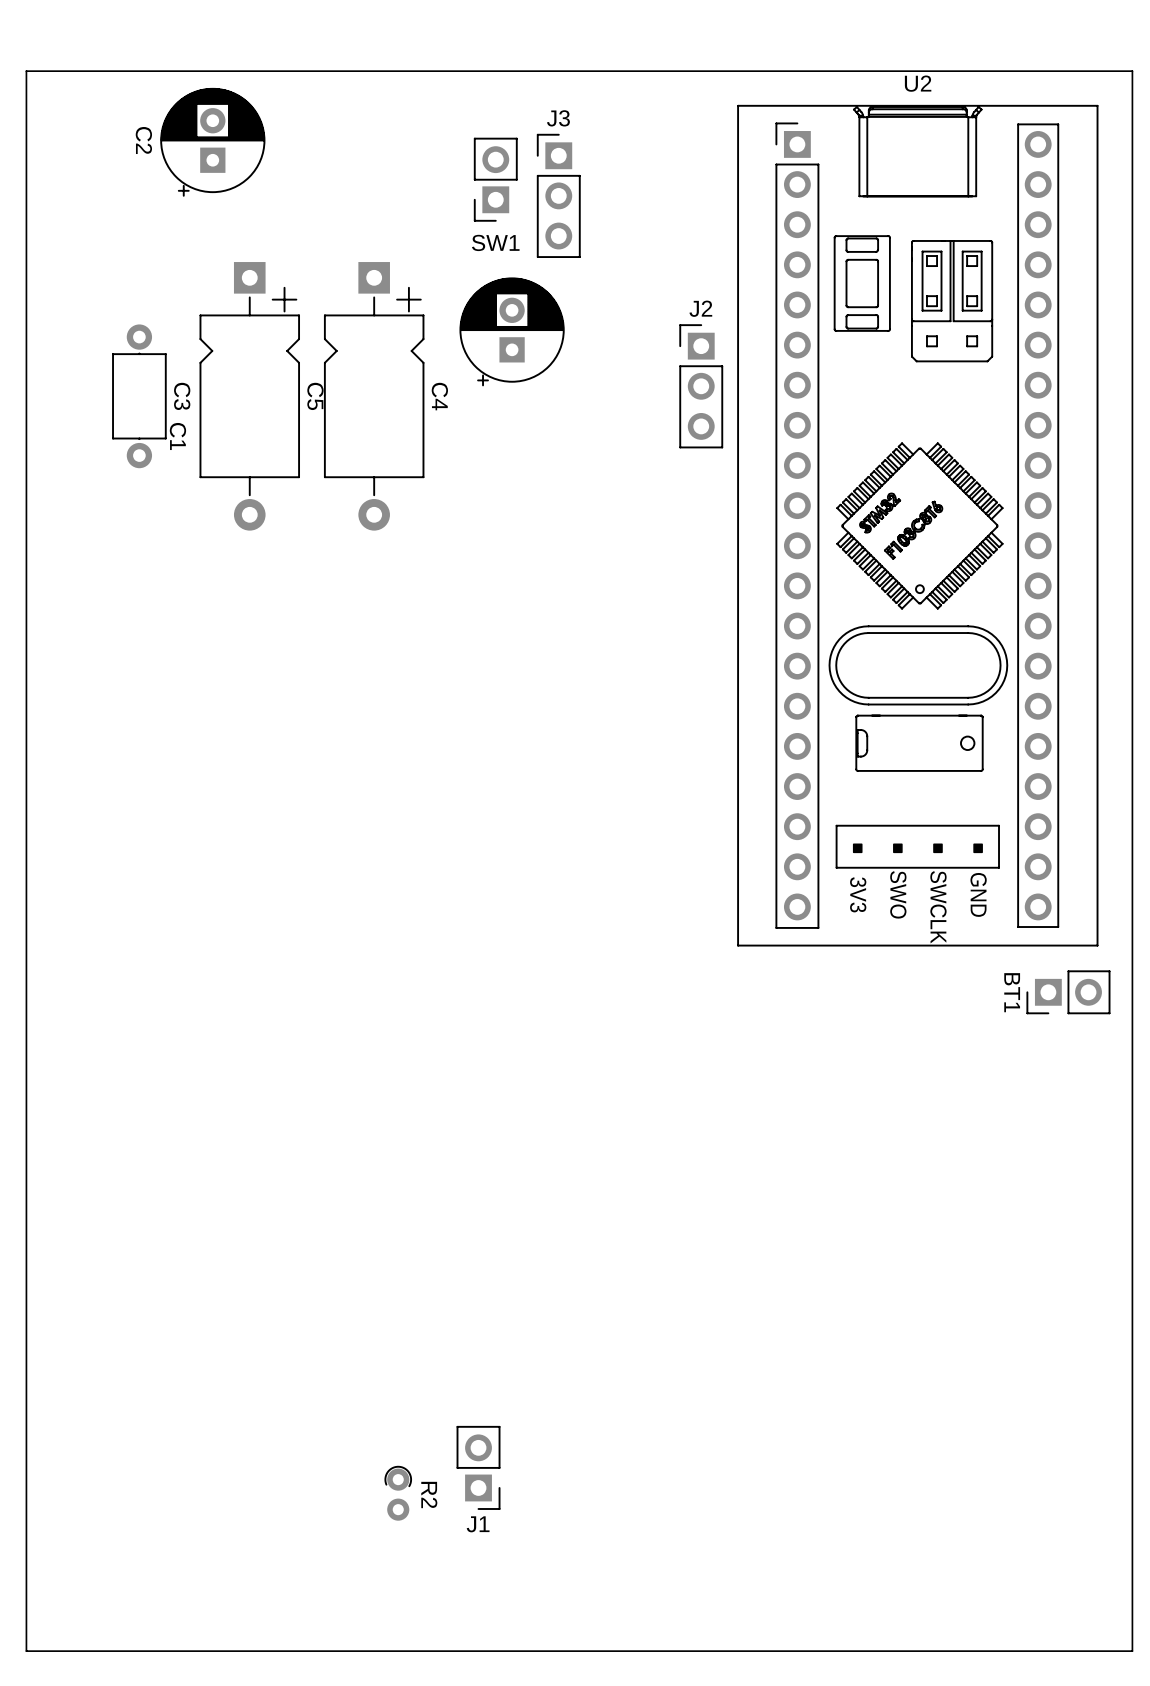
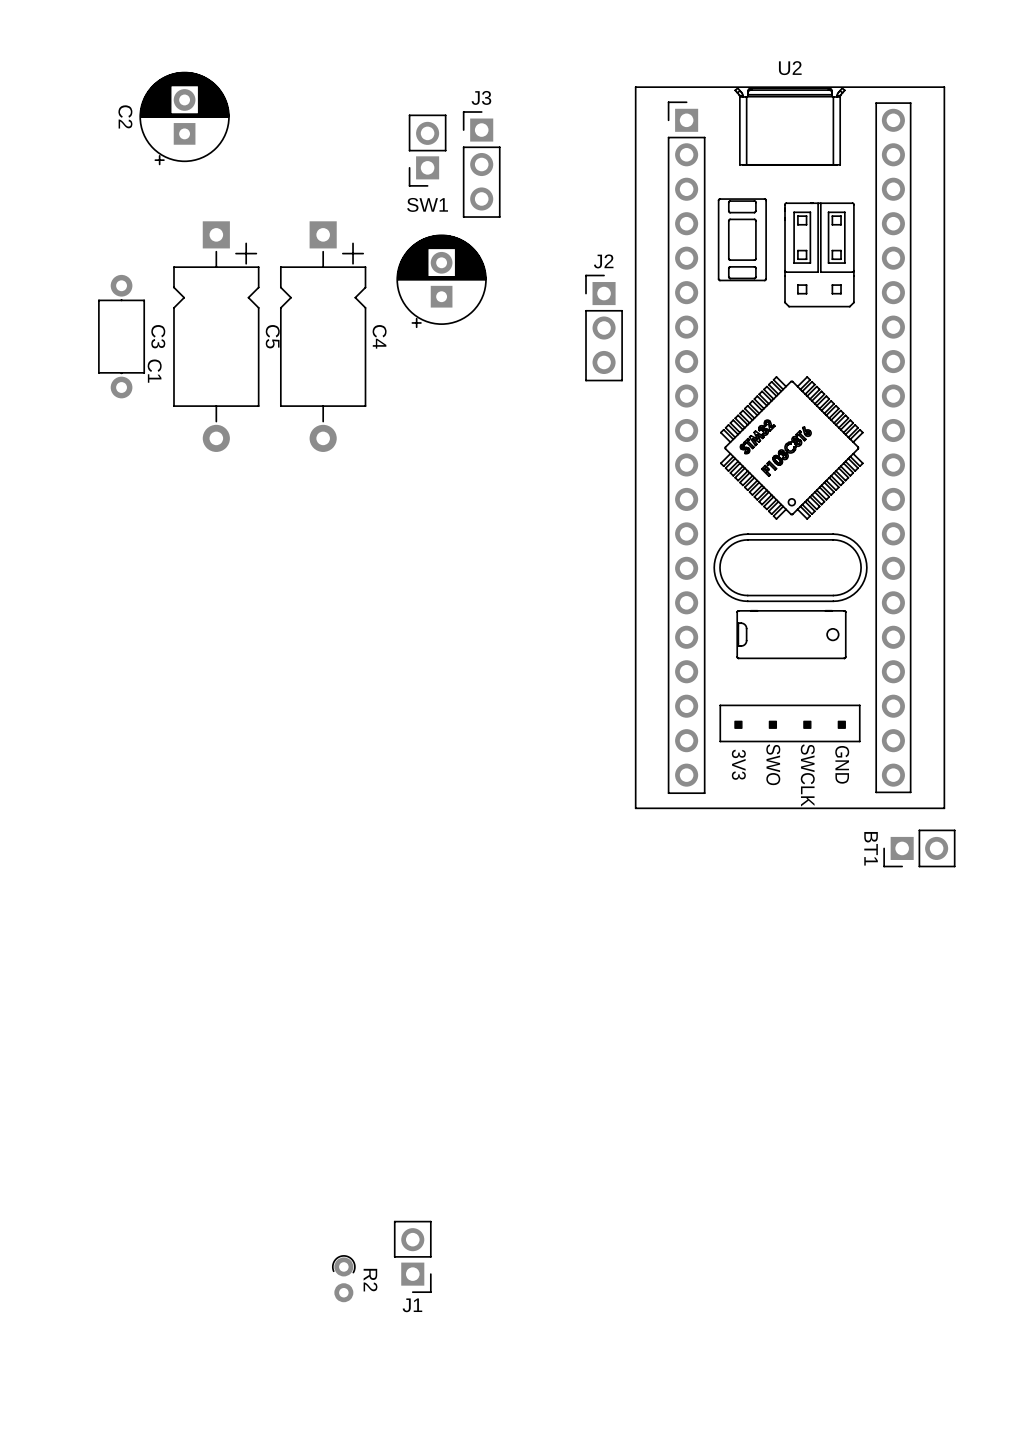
board edge: (1132, 71) (26, 71) (26, 1651) (1132, 1651) (1132, 71) -> none

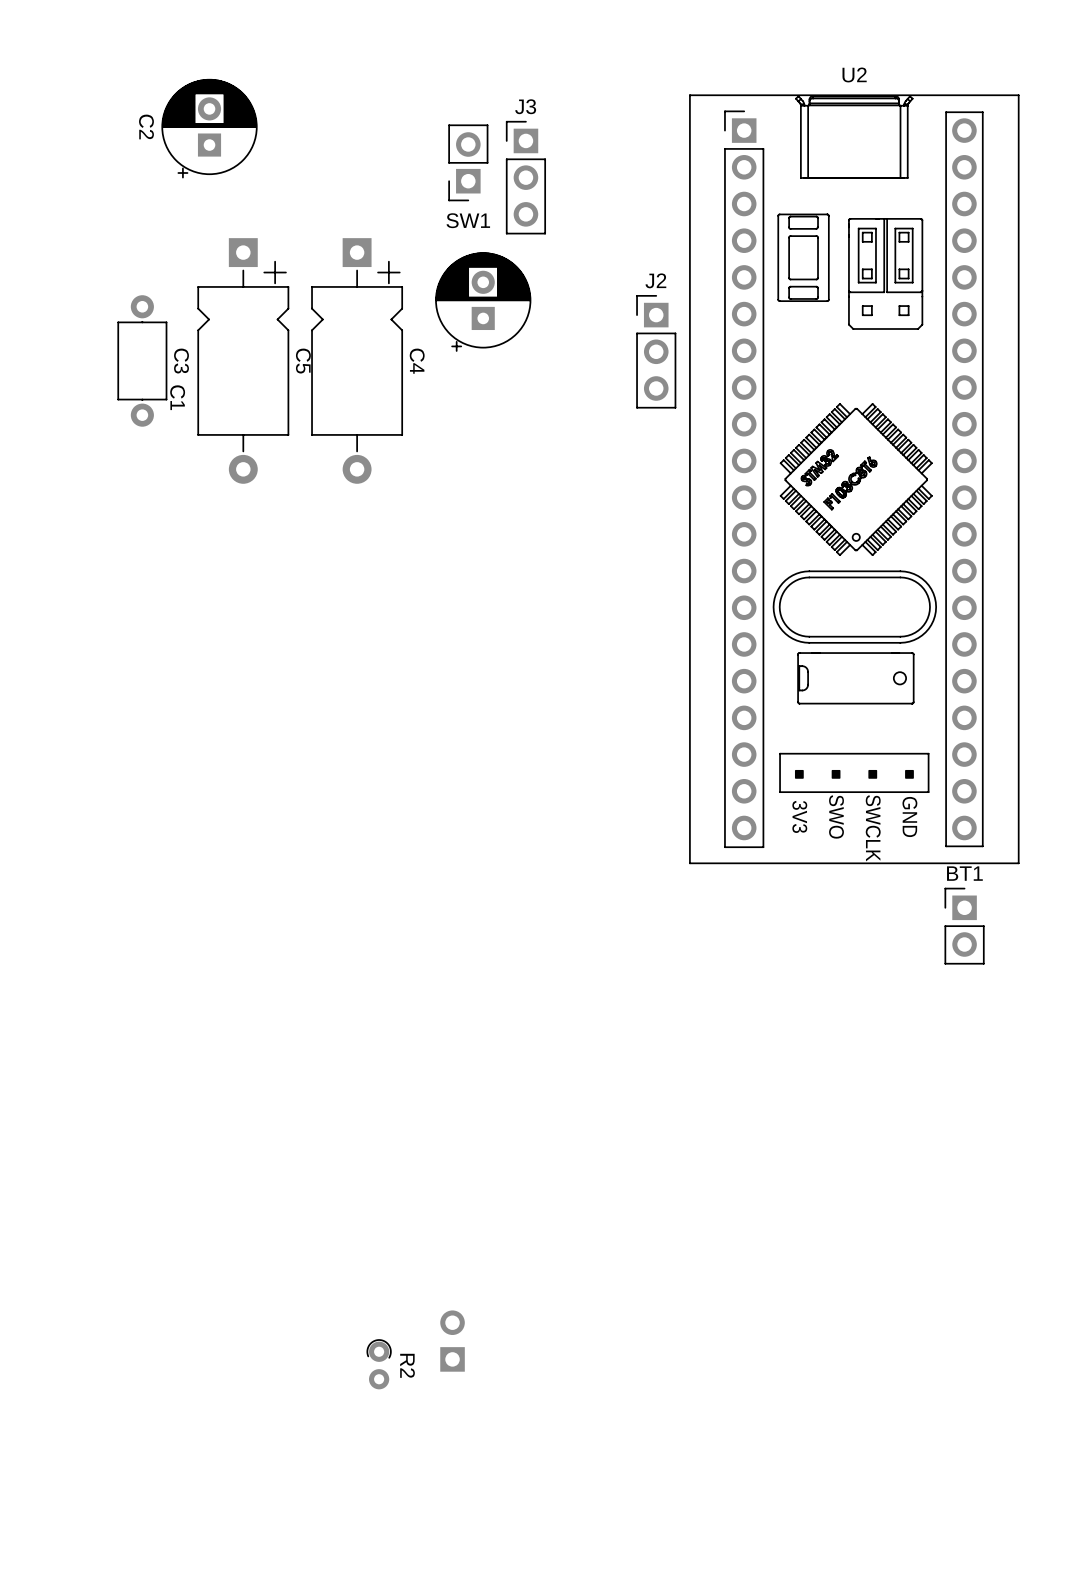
BT1 rotation: 0° (919, 848) -> 90° clockwise (964, 926)
J1 side: bottom (412, 1256) -> top (452, 1341)

